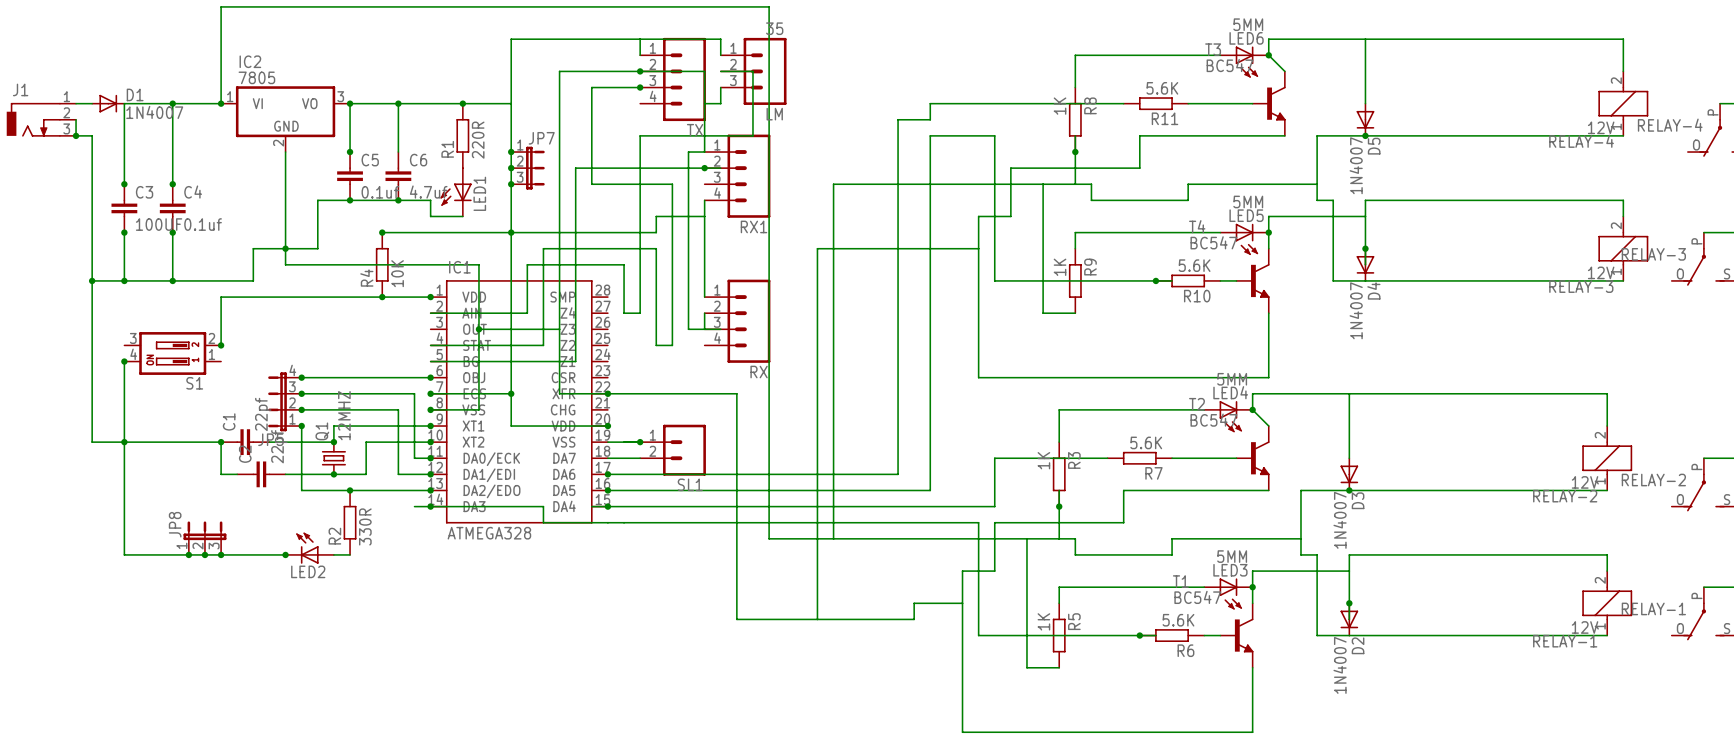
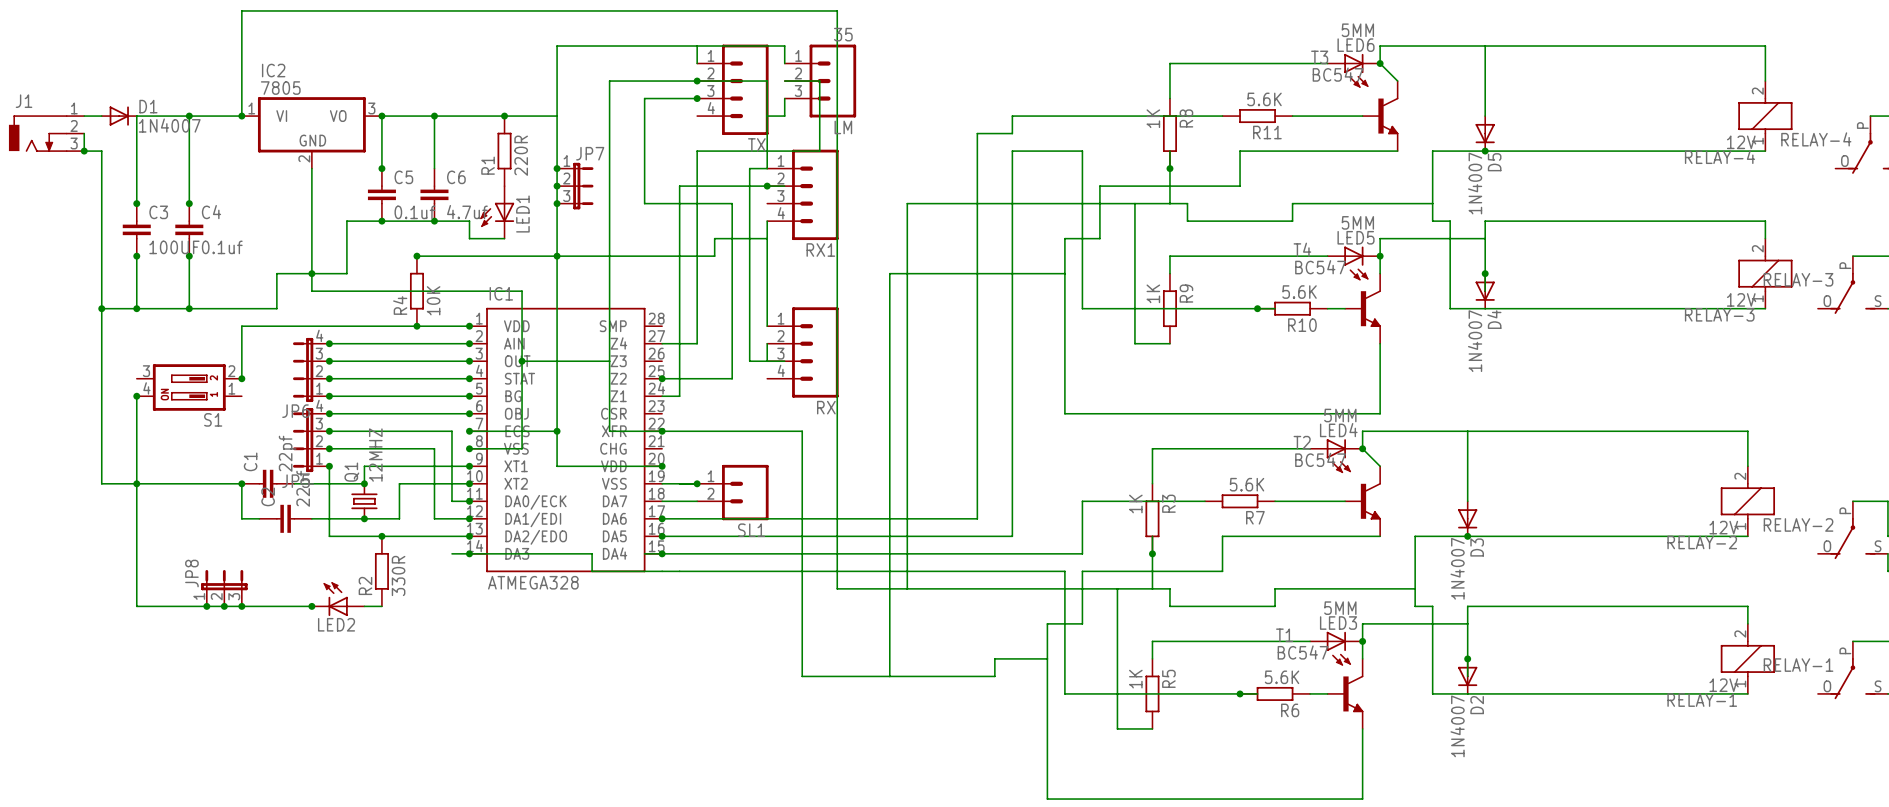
wire: (624, 168) (575, 168) (575, 361) (430, 361) -> (679, 186) (679, 291)
wire: (624, 264) (527, 264) (527, 313) (430, 313) -> (329, 343) (469, 343)
junction: none -> (329, 343)
junction: none -> (469, 343)
wire: none -> (662, 343) (679, 343) (679, 396) (662, 396)
wire: none -> (329, 361) (469, 361)
junction: none -> (329, 361)
junction: none -> (469, 361)
JP6: none -> (311, 369)
wire: none -> (329, 378) (469, 378)
junction: none -> (329, 378)
wire: (430, 345) (543, 345) (543, 248) (656, 248) (656, 345) -> (662, 378) (714, 378)
junction: none -> (469, 378)
junction: none -> (662, 378)
wire: none -> (329, 396) (469, 396)
junction: none -> (329, 396)
junction: none -> (469, 396)

